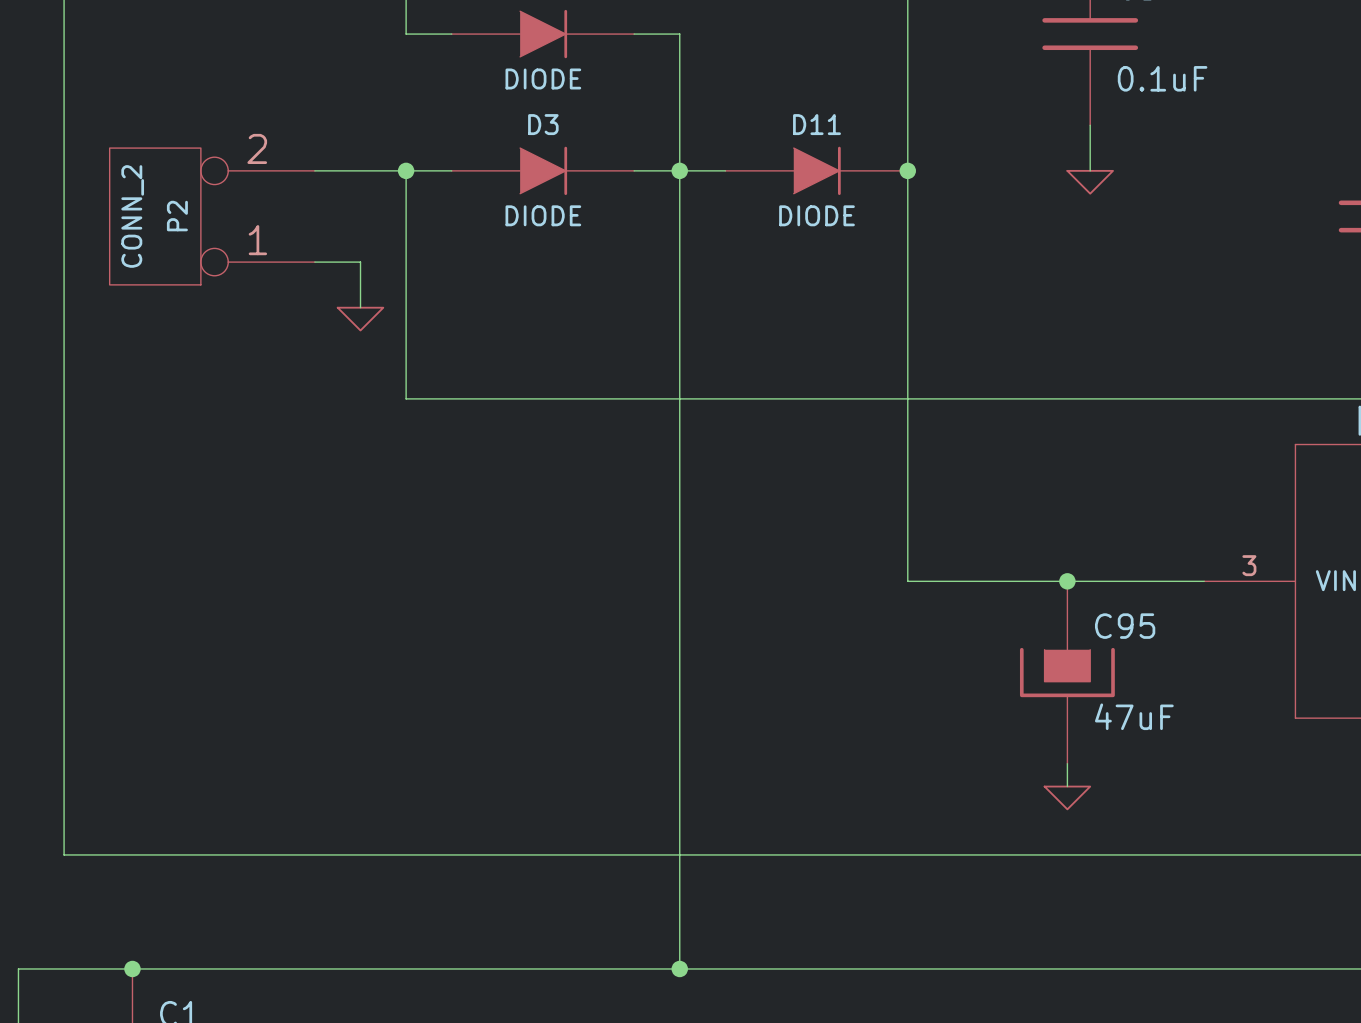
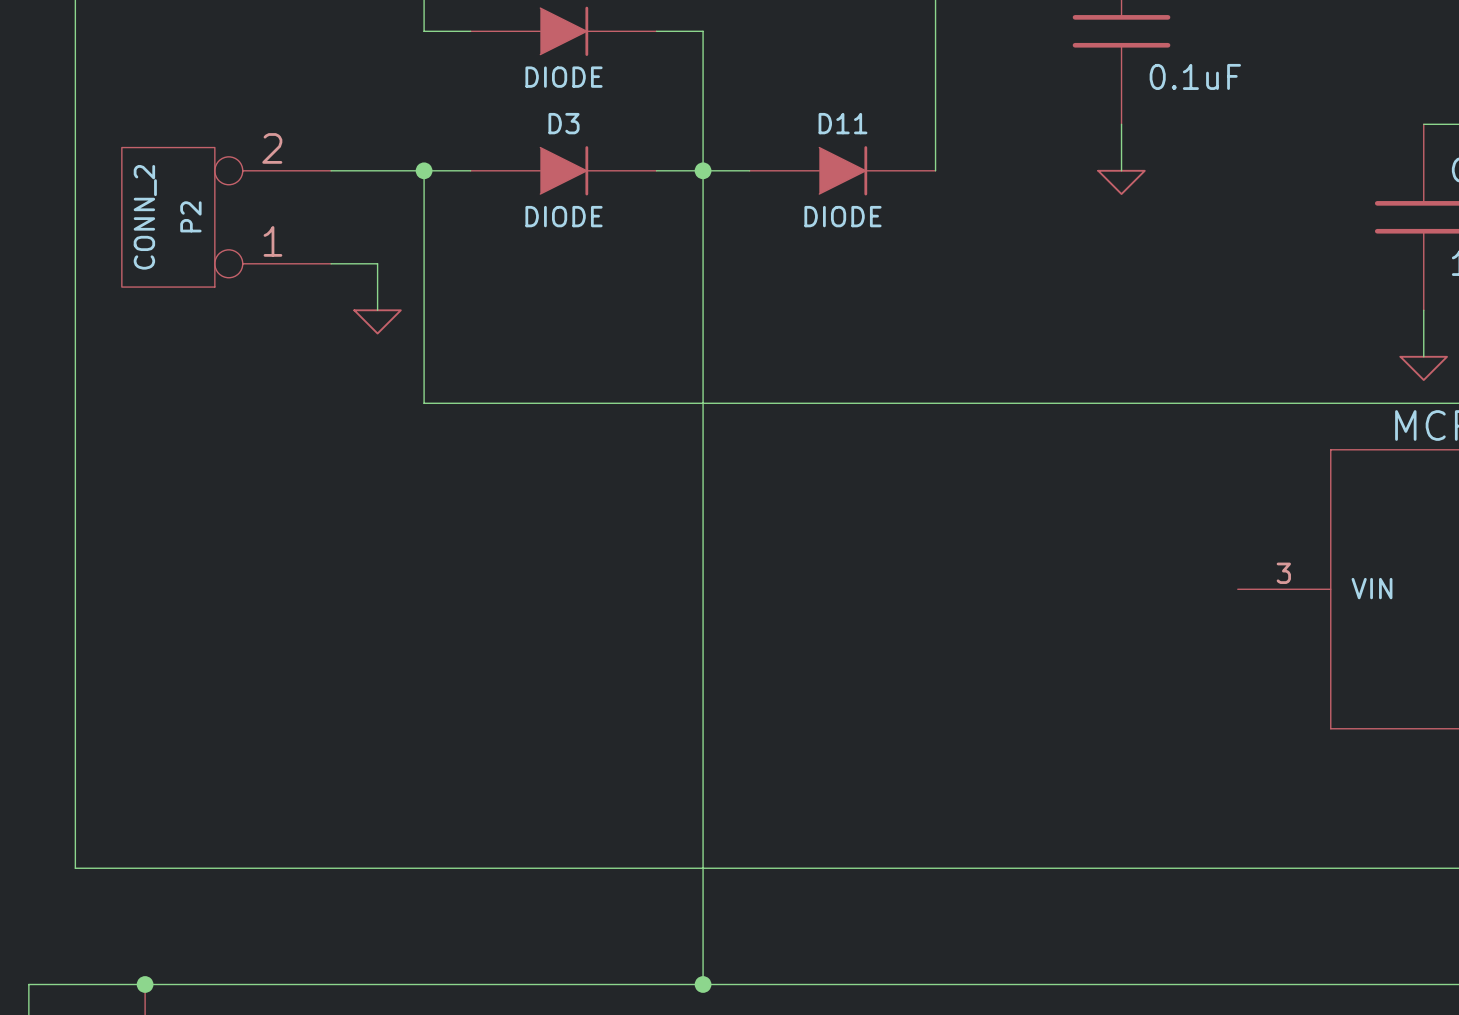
wire: (907, 170) (907, 581) (1204, 581) -> none
junction: (907, 170) -> none
junction: (1067, 581) -> none
C95: 47uF (1067, 672) -> none
wire: (1067, 763) (1067, 786) -> none
power symbol: (1067, 797) -> none

